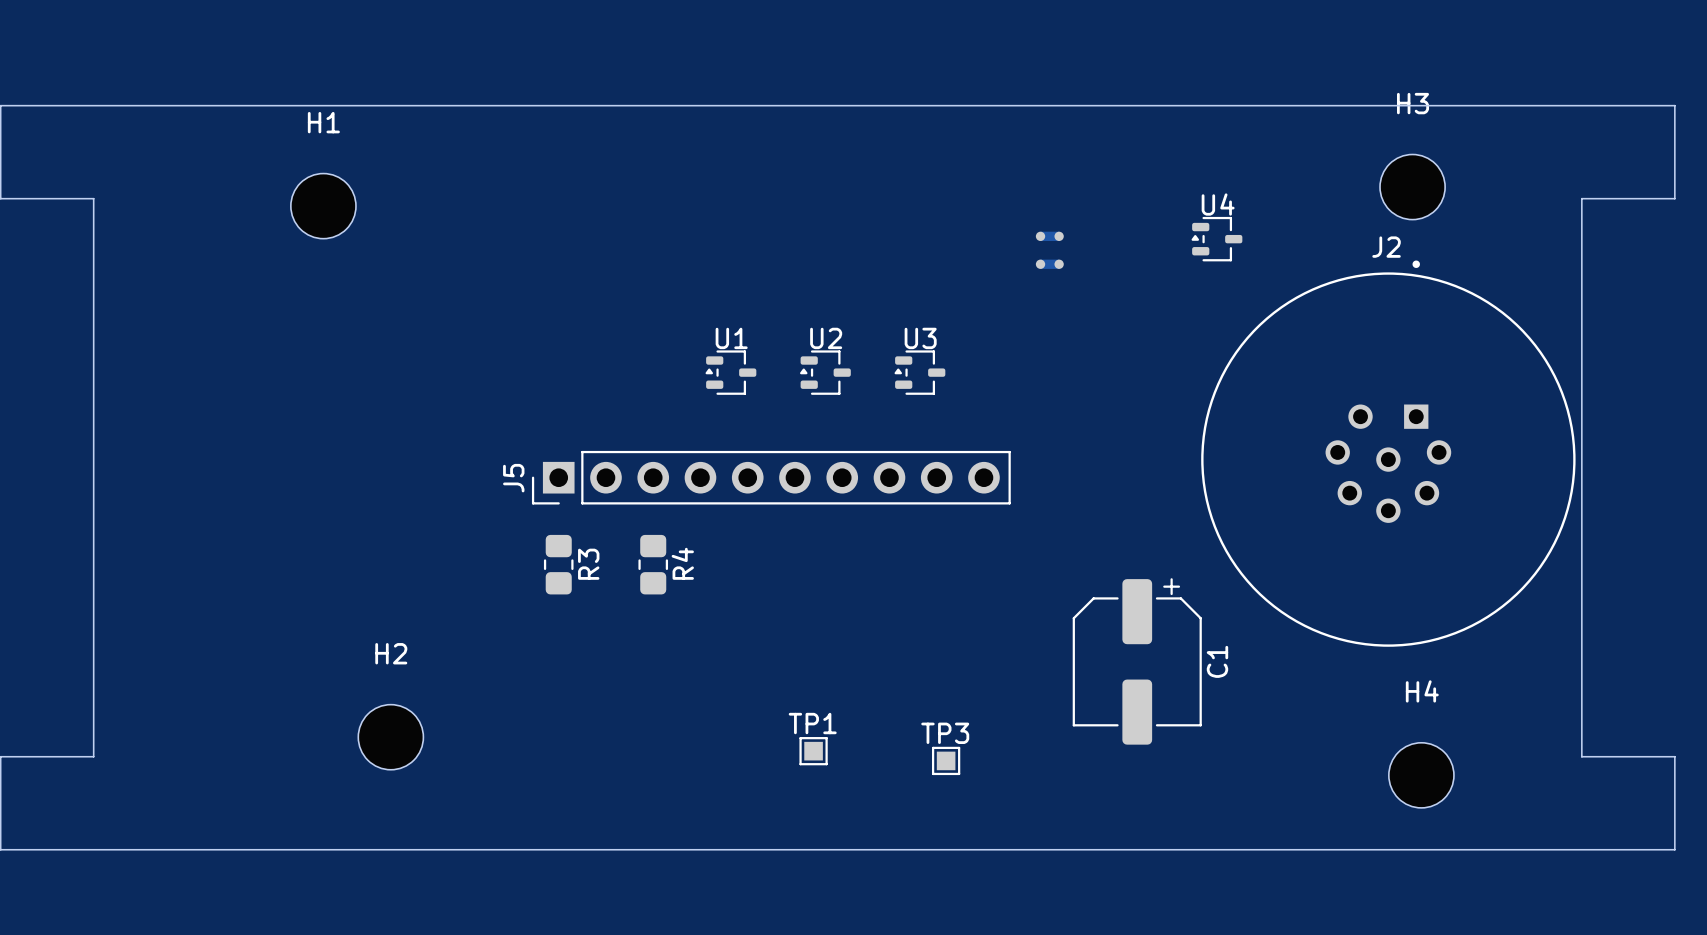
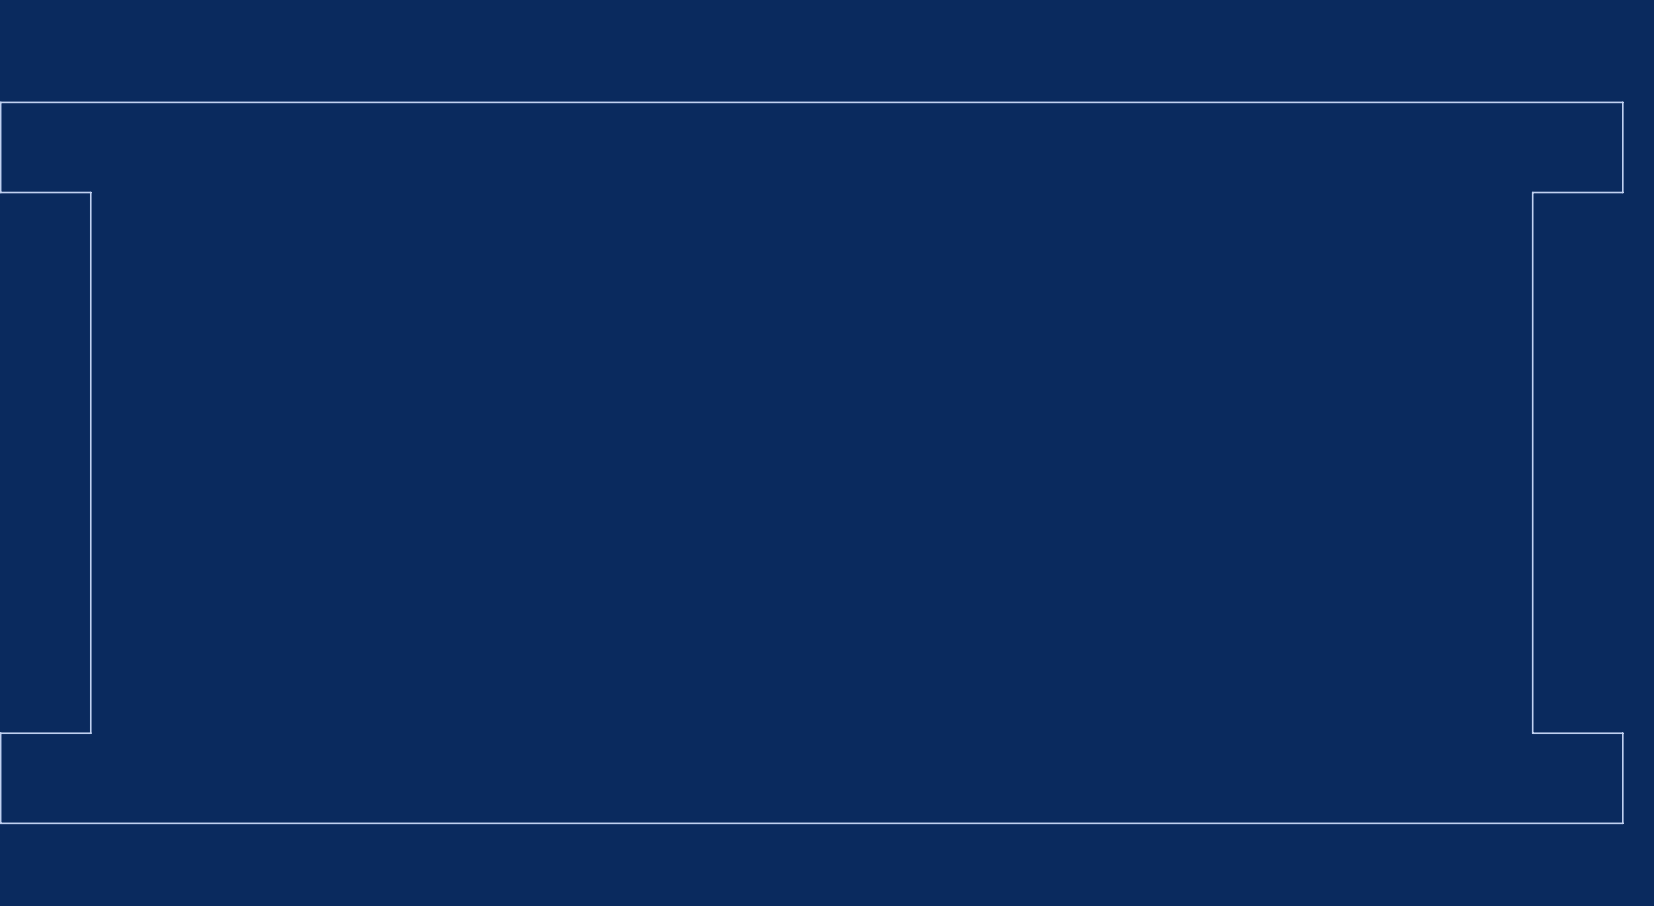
H3: (1412, 187) -> none
H1: (323, 206) -> none
part: (1049, 236) -> none
U4: (1216, 239) -> none
part: (1049, 264) -> none
U1: (730, 372) -> none
U2: (825, 372) -> none
U3: (919, 372) -> none
J2: (1388, 453) -> none
J5: (771, 477) -> none
R3: (558, 564) -> none
R4: (653, 564) -> none
C1: (1137, 661) -> none
H2: (390, 737) -> none
TP1: (813, 751) -> none
TP3: (946, 760) -> none
H4: (1421, 775) -> none

